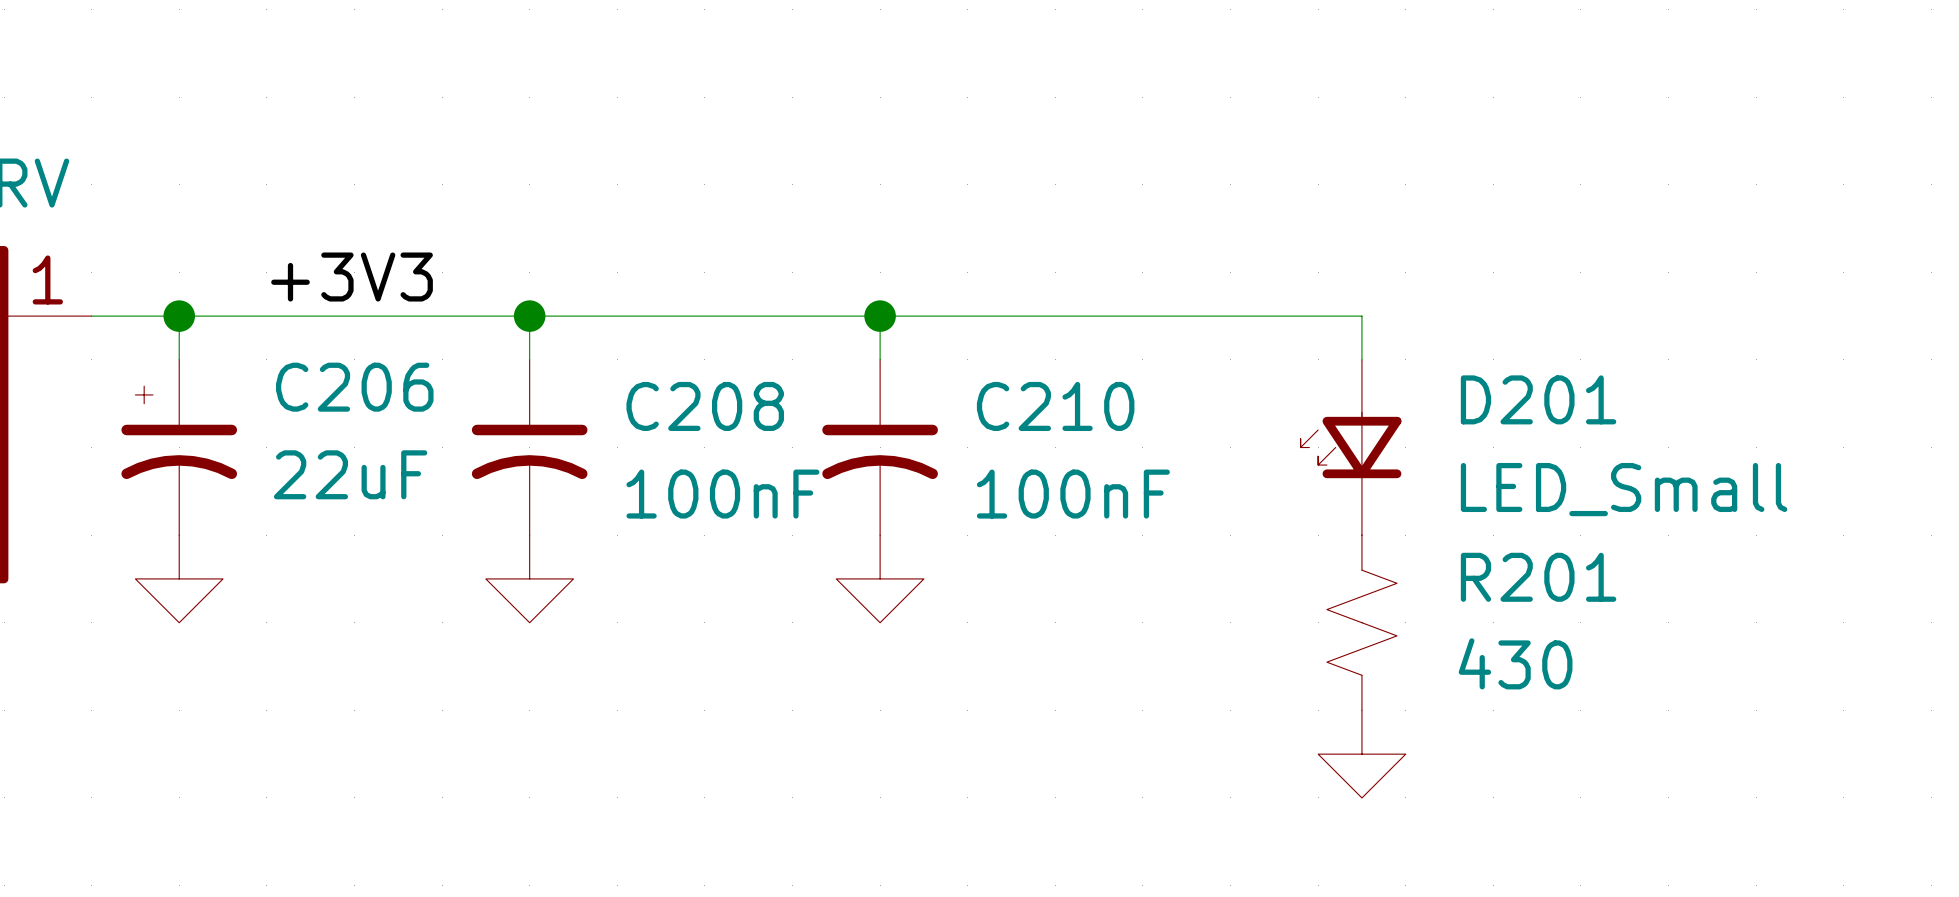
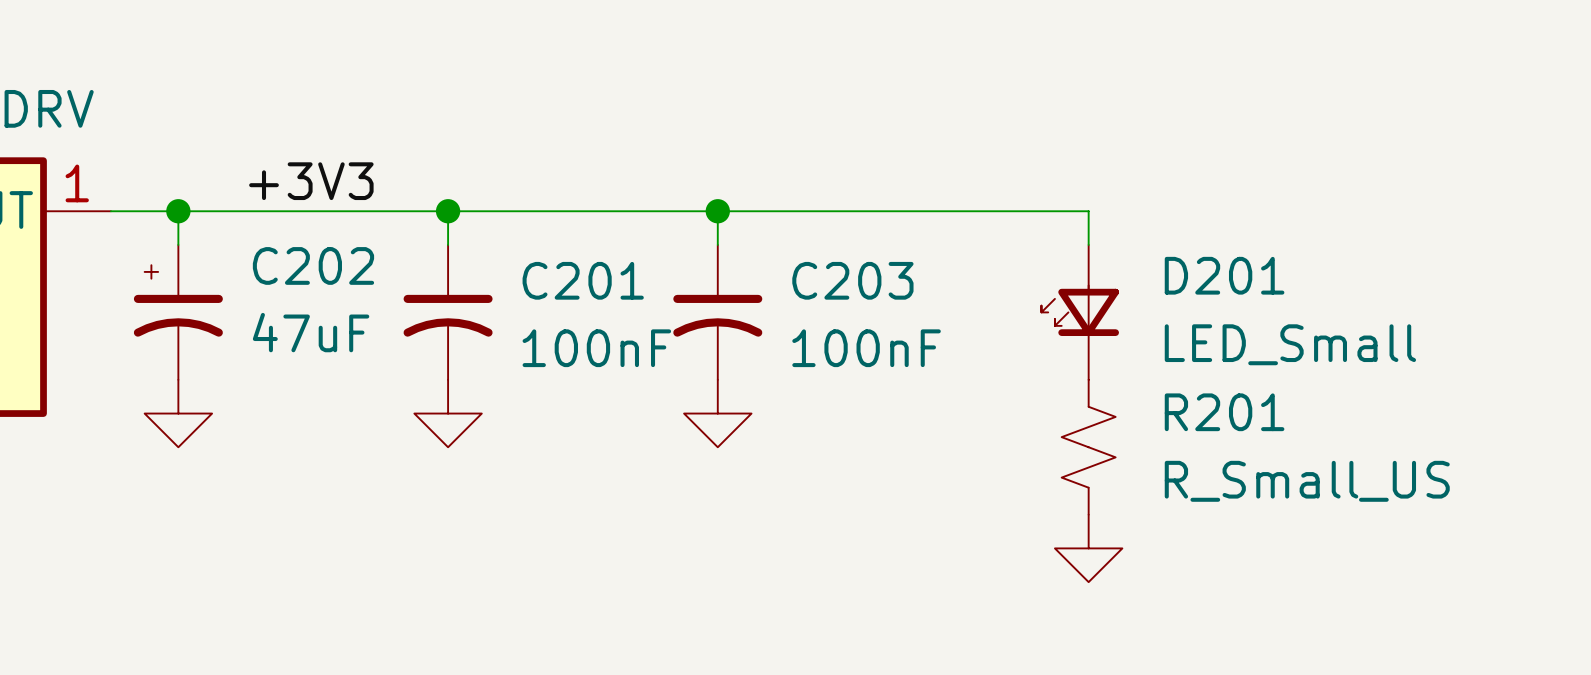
C206 name: C206 (354, 387) -> C202 (313, 265)
C208 name: C208 (705, 406) -> C201 (583, 280)
C210 name: C210 (1055, 406) -> C203 (852, 280)
C206 value: 22uF (350, 474) -> 47uF (311, 332)
R201 value: 430 (1515, 663) -> R_Small_US (1307, 481)

